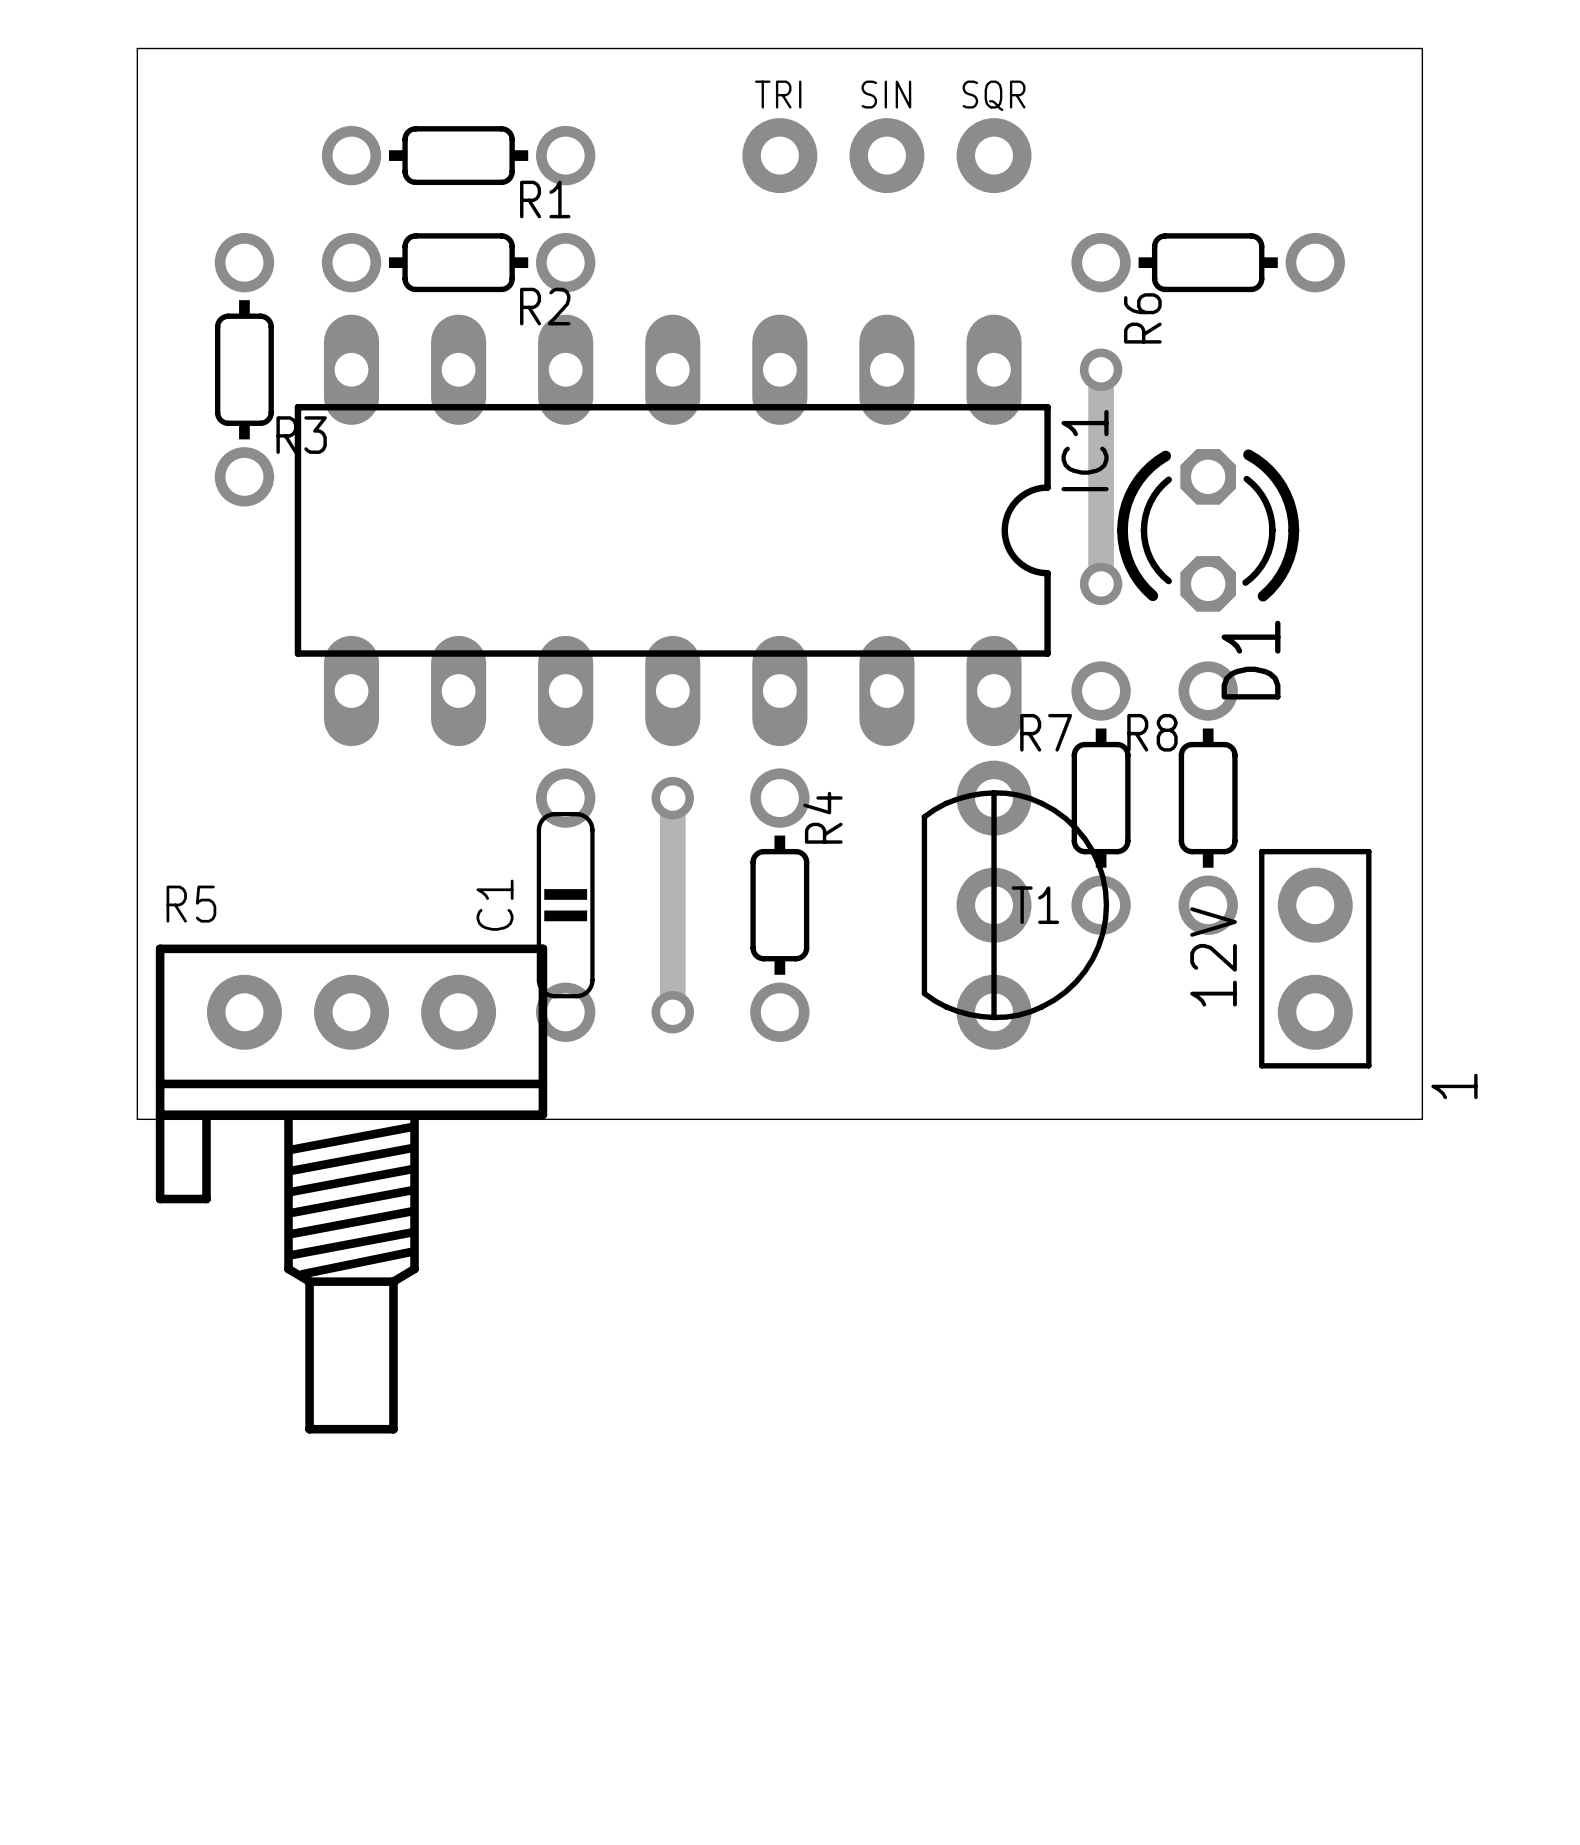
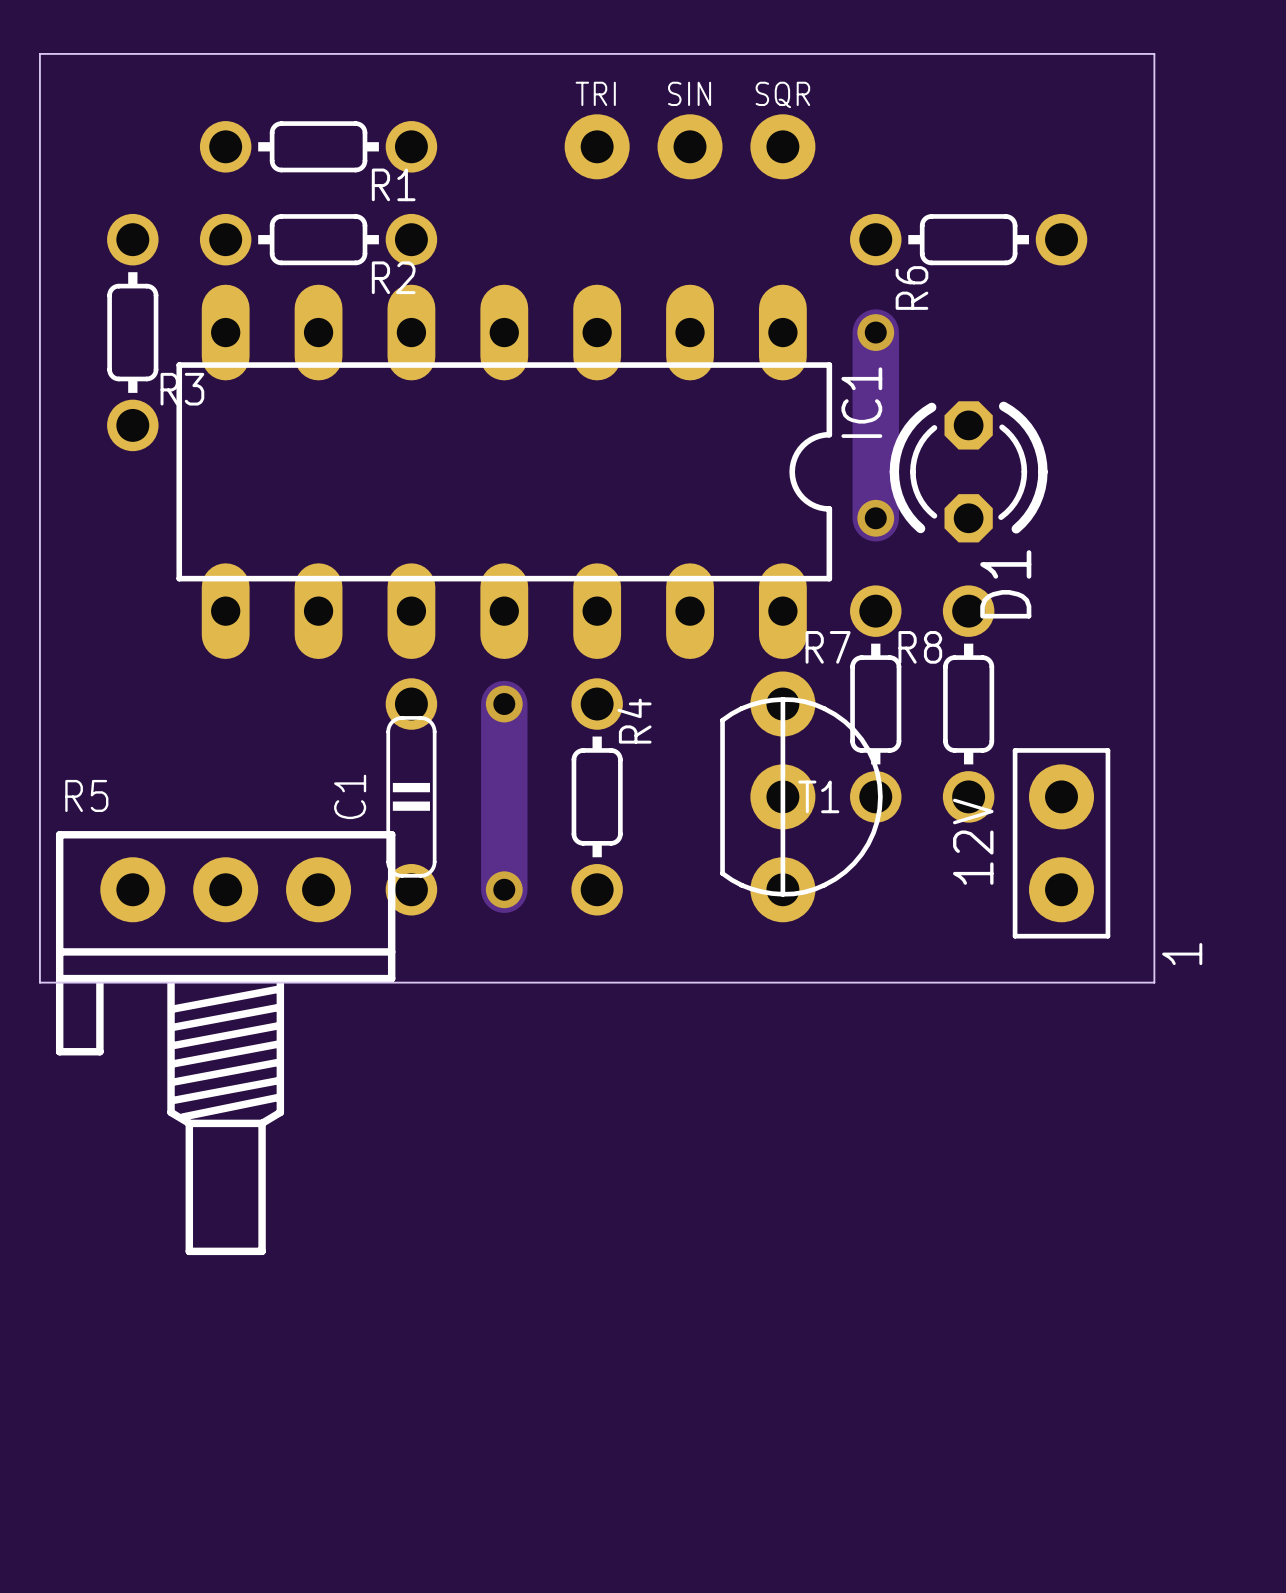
track width: thin (1101, 369) (1101, 583) -> thick (875, 332) (875, 518)
track width: thin (672, 798) (672, 1012) -> thick (504, 704) (504, 889)

